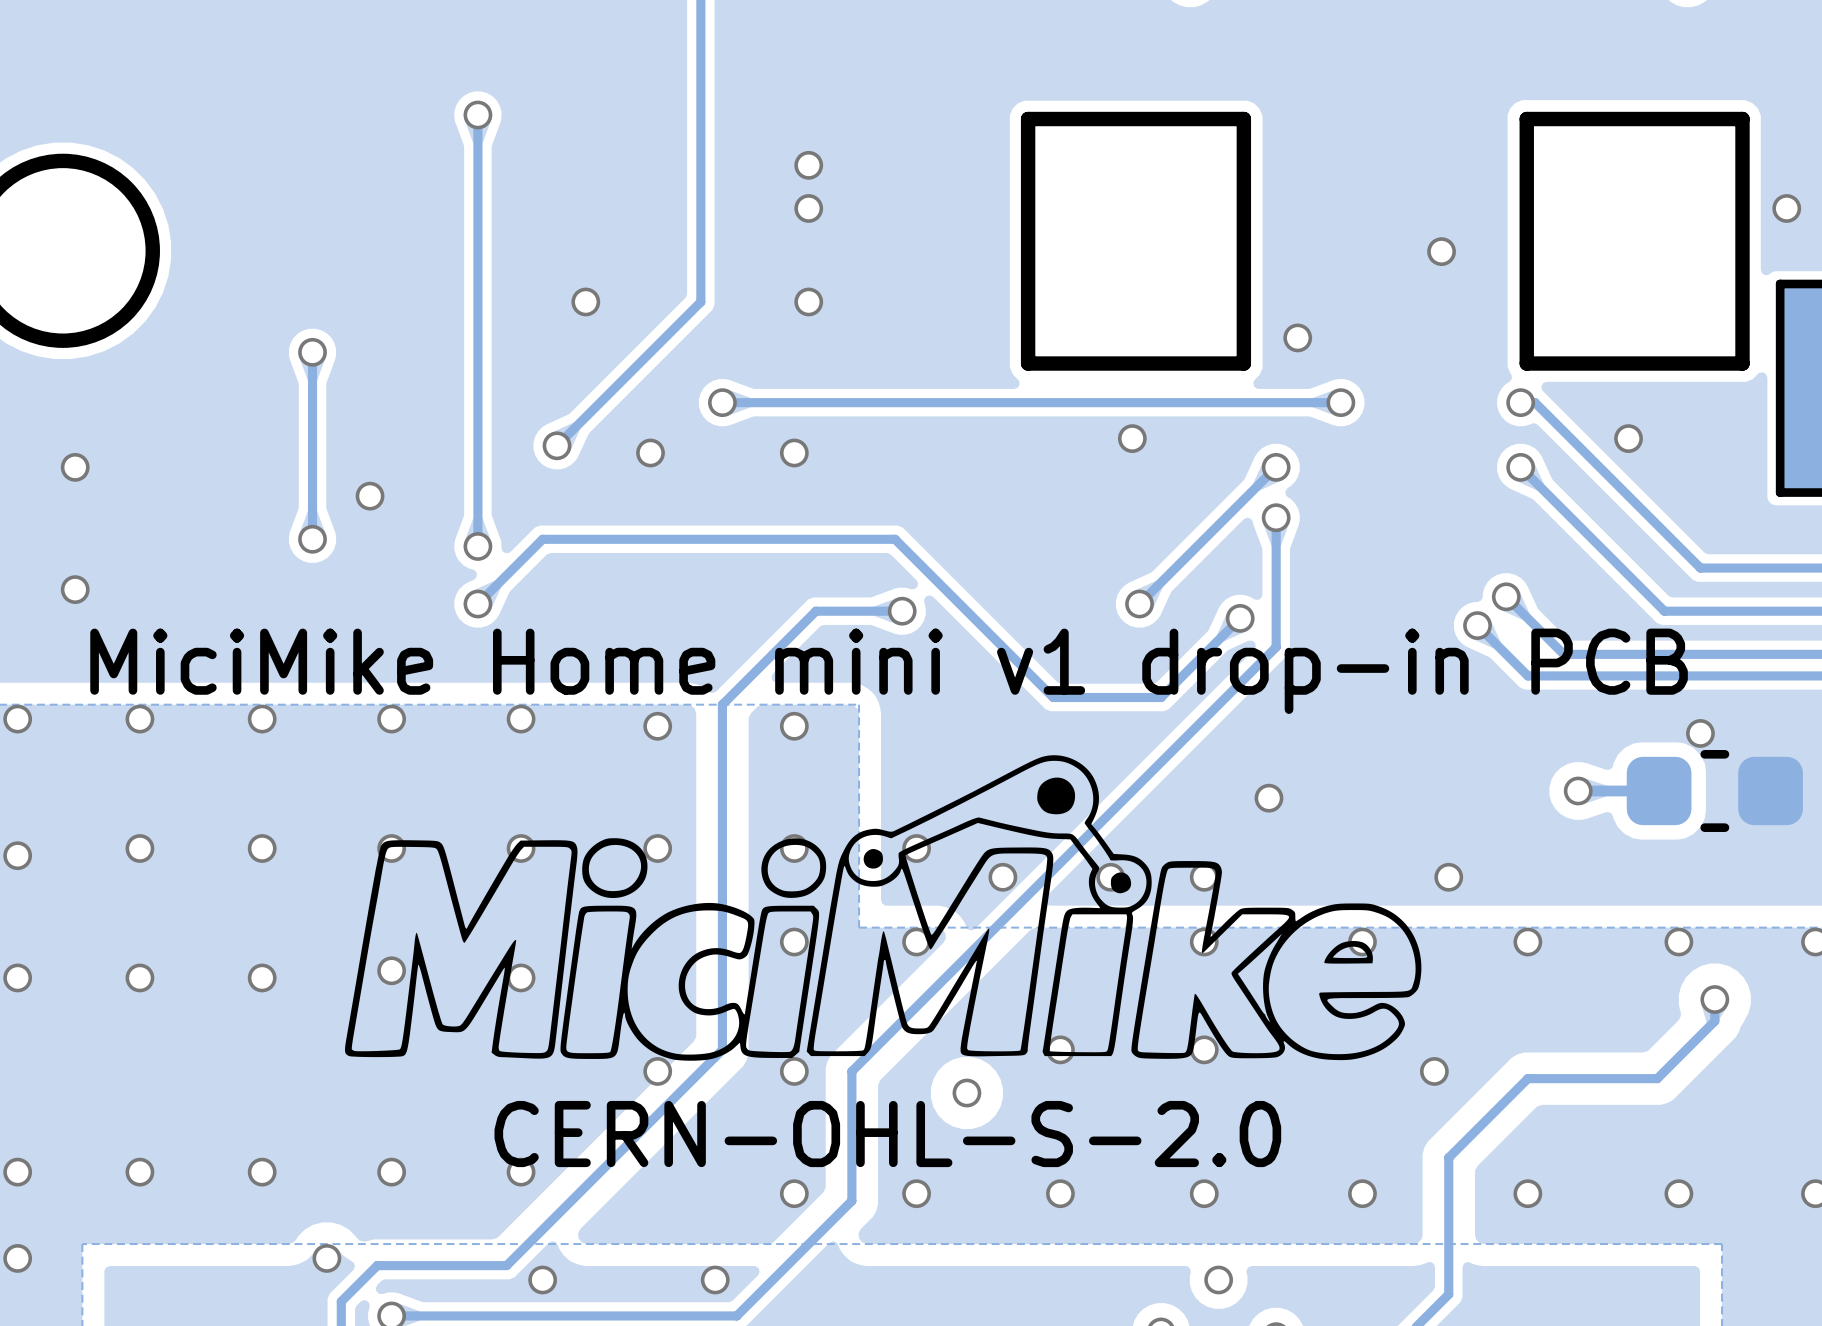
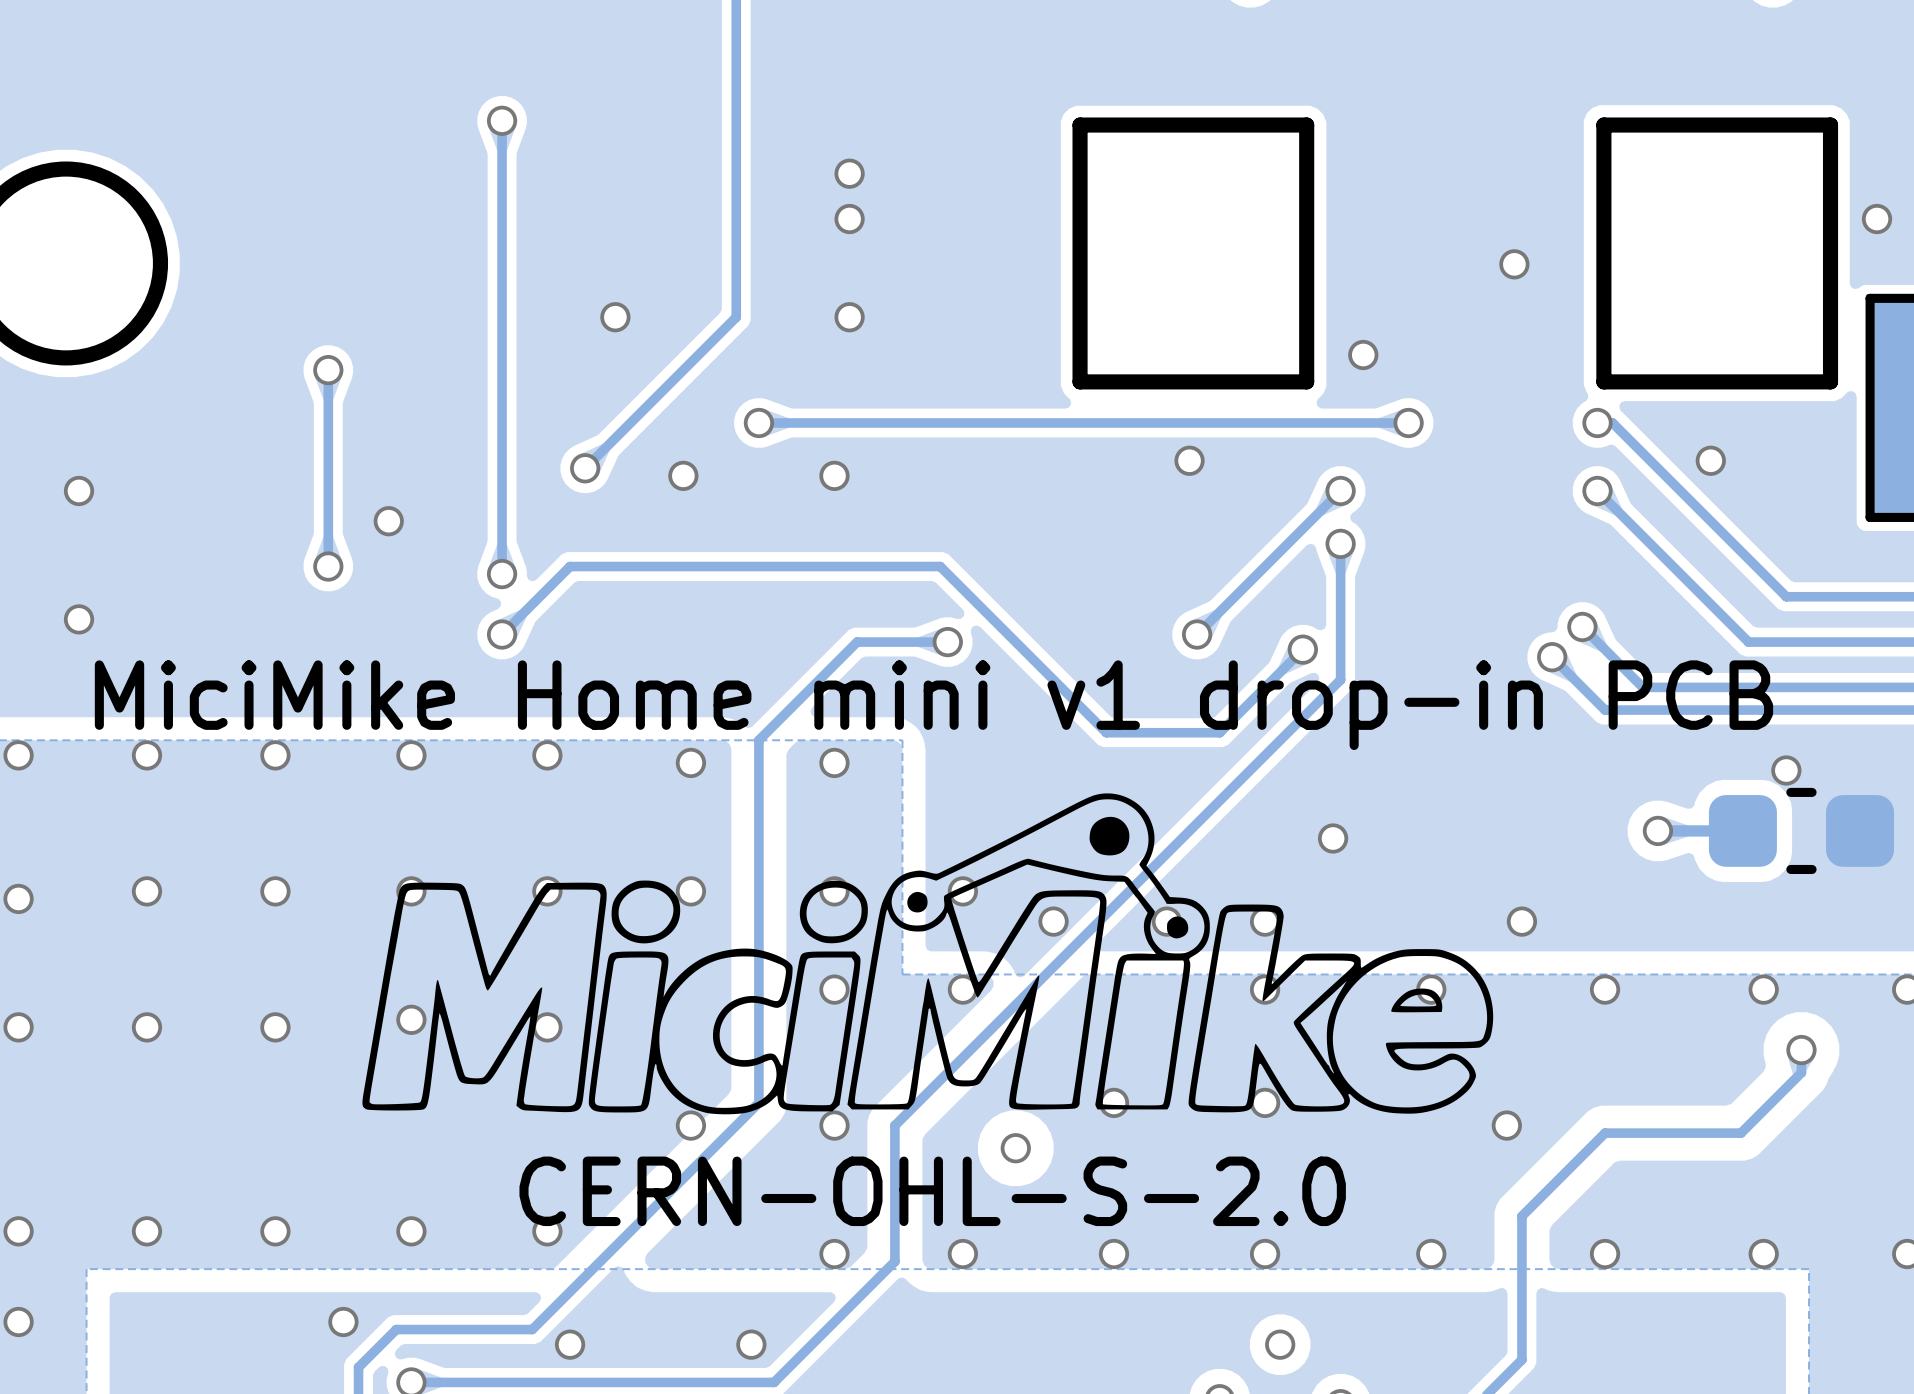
zone outline: (1722, 1244) (82, 1244) -> (1809, 1306) (1809, 1269) (86, 1269) (86, 1306)

